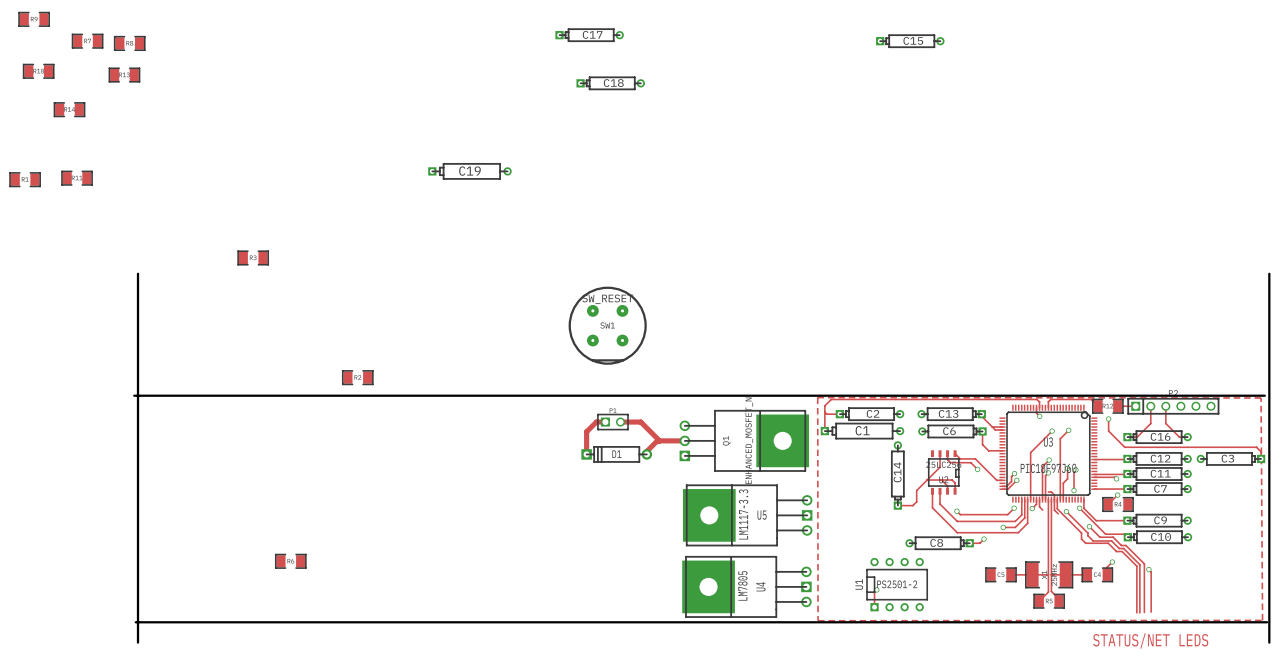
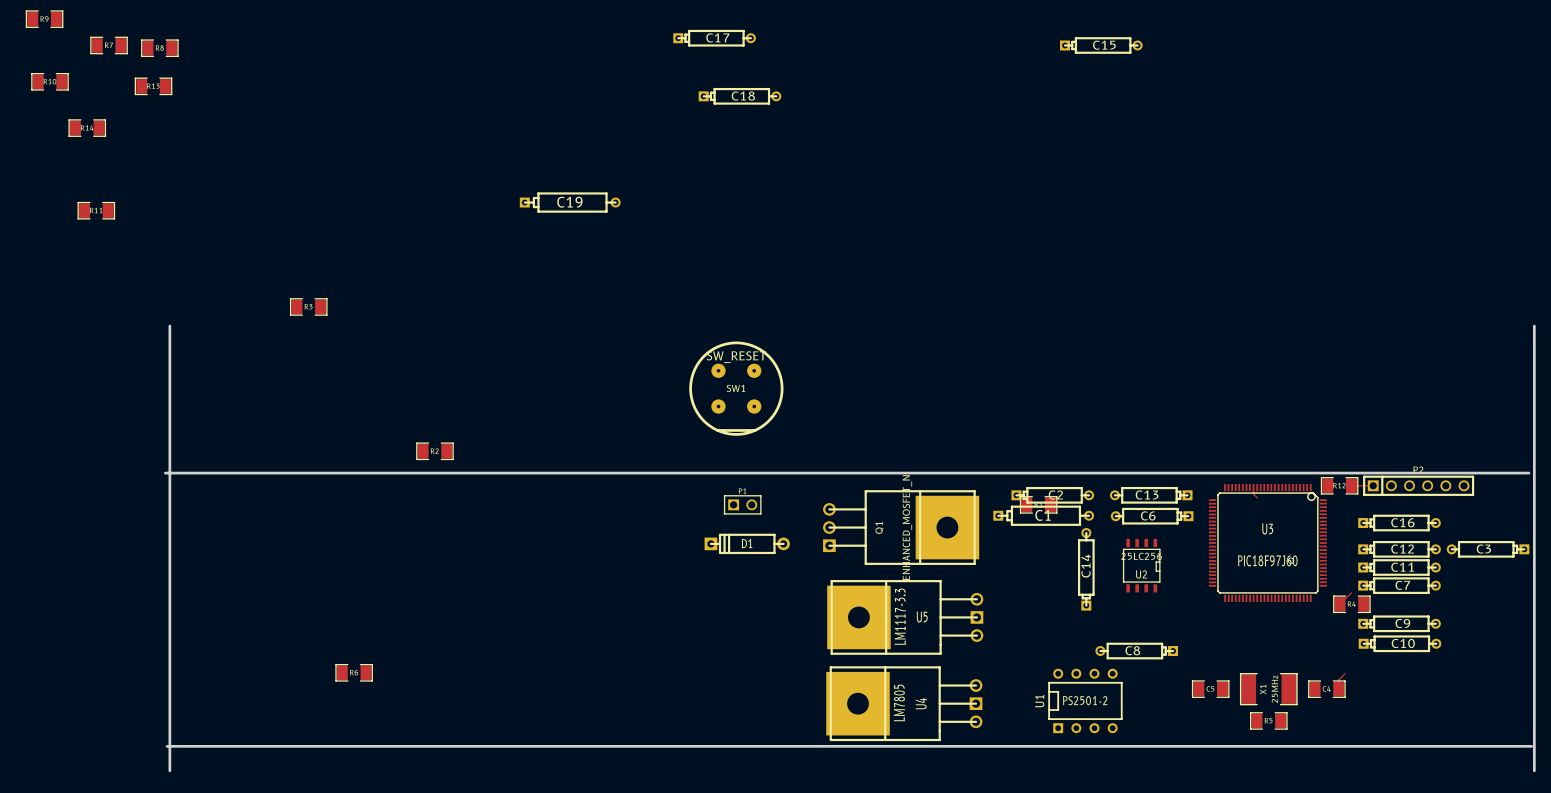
part position: (25, 179) -> (1038, 504)
zone outline: (817, 397) (1261, 397) (1262, 620) (818, 620) (817, 397) -> none
track: (1098, 406) (1091, 399) (1050, 399) (1048, 401) (1048, 407) -> none
track: (1150, 406) (1150, 423) (1137, 437) (1127, 437) -> none
track: (1165, 406) (1165, 423) (1179, 437) (1187, 437) -> none
track: (1039, 407) (1039, 401) (1037, 399) (831, 399) (824, 405) (824, 431) -> none
track: (824, 412) (826, 414) (839, 414) -> none
track: (981, 414) (995, 429) (1002, 429) -> none
via: (1039, 416) -> none
track: (1108, 419) (1108, 431) (1124, 447) (1256, 447) (1261, 451) (1261, 458) -> none
via: (1108, 419) -> none
track: (605, 422) (596, 422) (586, 431) (586, 454) -> none
track: (620, 422) (640, 422) (659, 440) -> none
track: (992, 427) (1002, 427) -> none
track: (1068, 430) (1060, 438) (1060, 499) -> none
via: (1068, 430) -> none
track: (982, 431) (982, 444) (988, 450) (1002, 450) -> none
track: (1052, 431) (1030, 452) (1030, 499) -> none
via: (1052, 431) -> none
track: (684, 440) (657, 440) (646, 451) (646, 454) -> none
track: (940, 453) (940, 467) (916, 490) (916, 501) (912, 505) (897, 505) -> none
track: (947, 453) (947, 459) (950, 462) (970, 462) (977, 469) -> none
track: (955, 453) (960, 458) (975, 458) (996, 480) (1002, 480) -> none
track: (1127, 458) (1094, 459) -> none
track: (1049, 460) (1042, 466) (1042, 499) -> none
via: (1049, 460) -> none
track: (1067, 468) (1067, 478) (1063, 483) (1063, 499) -> none
via: (977, 469) -> none
track: (1075, 469) (1074, 471) (1074, 490) -> none
via: (1075, 469) -> none
track: (1048, 472) (1045, 475) (1045, 499) -> none
via: (1048, 472) -> none
track: (1014, 473) (1011, 476) (1011, 481) (1006, 486) (1002, 486) -> none
via: (1014, 473) -> none
track: (1127, 473) (1094, 474) -> none
track: (1094, 477) (1116, 478) -> none
via: (1116, 478) -> none
track: (927, 480) (952, 480) (955, 483) (955, 491) -> none
track: (941, 480) (947, 486) (947, 491) -> none
track: (1016, 480) (1007, 489) (1002, 489) -> none
via: (1016, 480) -> none
track: (1127, 489) (1094, 489) -> none
via: (1074, 490) -> none
track: (932, 491) (932, 507) (957, 532) (1018, 532) (1027, 523) (1027, 499) -> none
track: (940, 491) (940, 504) (957, 521) (1015, 521) (1021, 514) (1021, 499) -> none
track: (1048, 492) (1054, 495) (1054, 510) (1058, 513) -> none
via: (1117, 495) -> none
track: (1024, 499) (1024, 517) (1015, 527) (1003, 527) -> none
track: (1036, 499) (1036, 504) (1032, 508) -> none
track: (1039, 499) (1039, 506) (1042, 510) -> none
track: (1048, 499) (1048, 592) (1039, 601) -> none
track: (1051, 499) (1051, 591) (1058, 601) -> none
track: (1057, 499) (1057, 508) (1081, 533) (1081, 539) (1085, 543) (1108, 543) (1116, 551) (1122, 551) (1136, 566) (1136, 612) -> none
track: (1083, 499) (1083, 508) (1096, 520) (1127, 520) -> none
track: (1014, 508) (1007, 514) (960, 514) (956, 511) -> none
via: (1014, 508) -> none
via: (1032, 508) -> none
track: (1079, 508) (1105, 534) (1126, 534) -> none
via: (1079, 508) -> none
via: (956, 511) -> none
track: (1066, 511) (1093, 540) (1111, 540) (1119, 548) (1123, 548) (1139, 564) (1139, 612) -> none
via: (1066, 511) -> none
track: (1089, 526) (1099, 537) (1113, 537) (1121, 545) (1125, 545) (1144, 563) (1144, 612) -> none
via: (1089, 526) -> none
via: (1003, 527) -> none
track: (984, 539) (979, 543) (969, 543) -> none
via: (984, 539) -> none
via: (1112, 562) -> none
track: (1148, 569) (1151, 571) (1151, 612) -> none
via: (1148, 569) -> none
track: (1010, 574) (1048, 574) -> none
track: (1051, 574) (1087, 574) -> none
track: (876, 589) (874, 592) (874, 607) -> none
via: (876, 589) -> none
text: STATUS/NET LEDS (1150, 640) -> none

